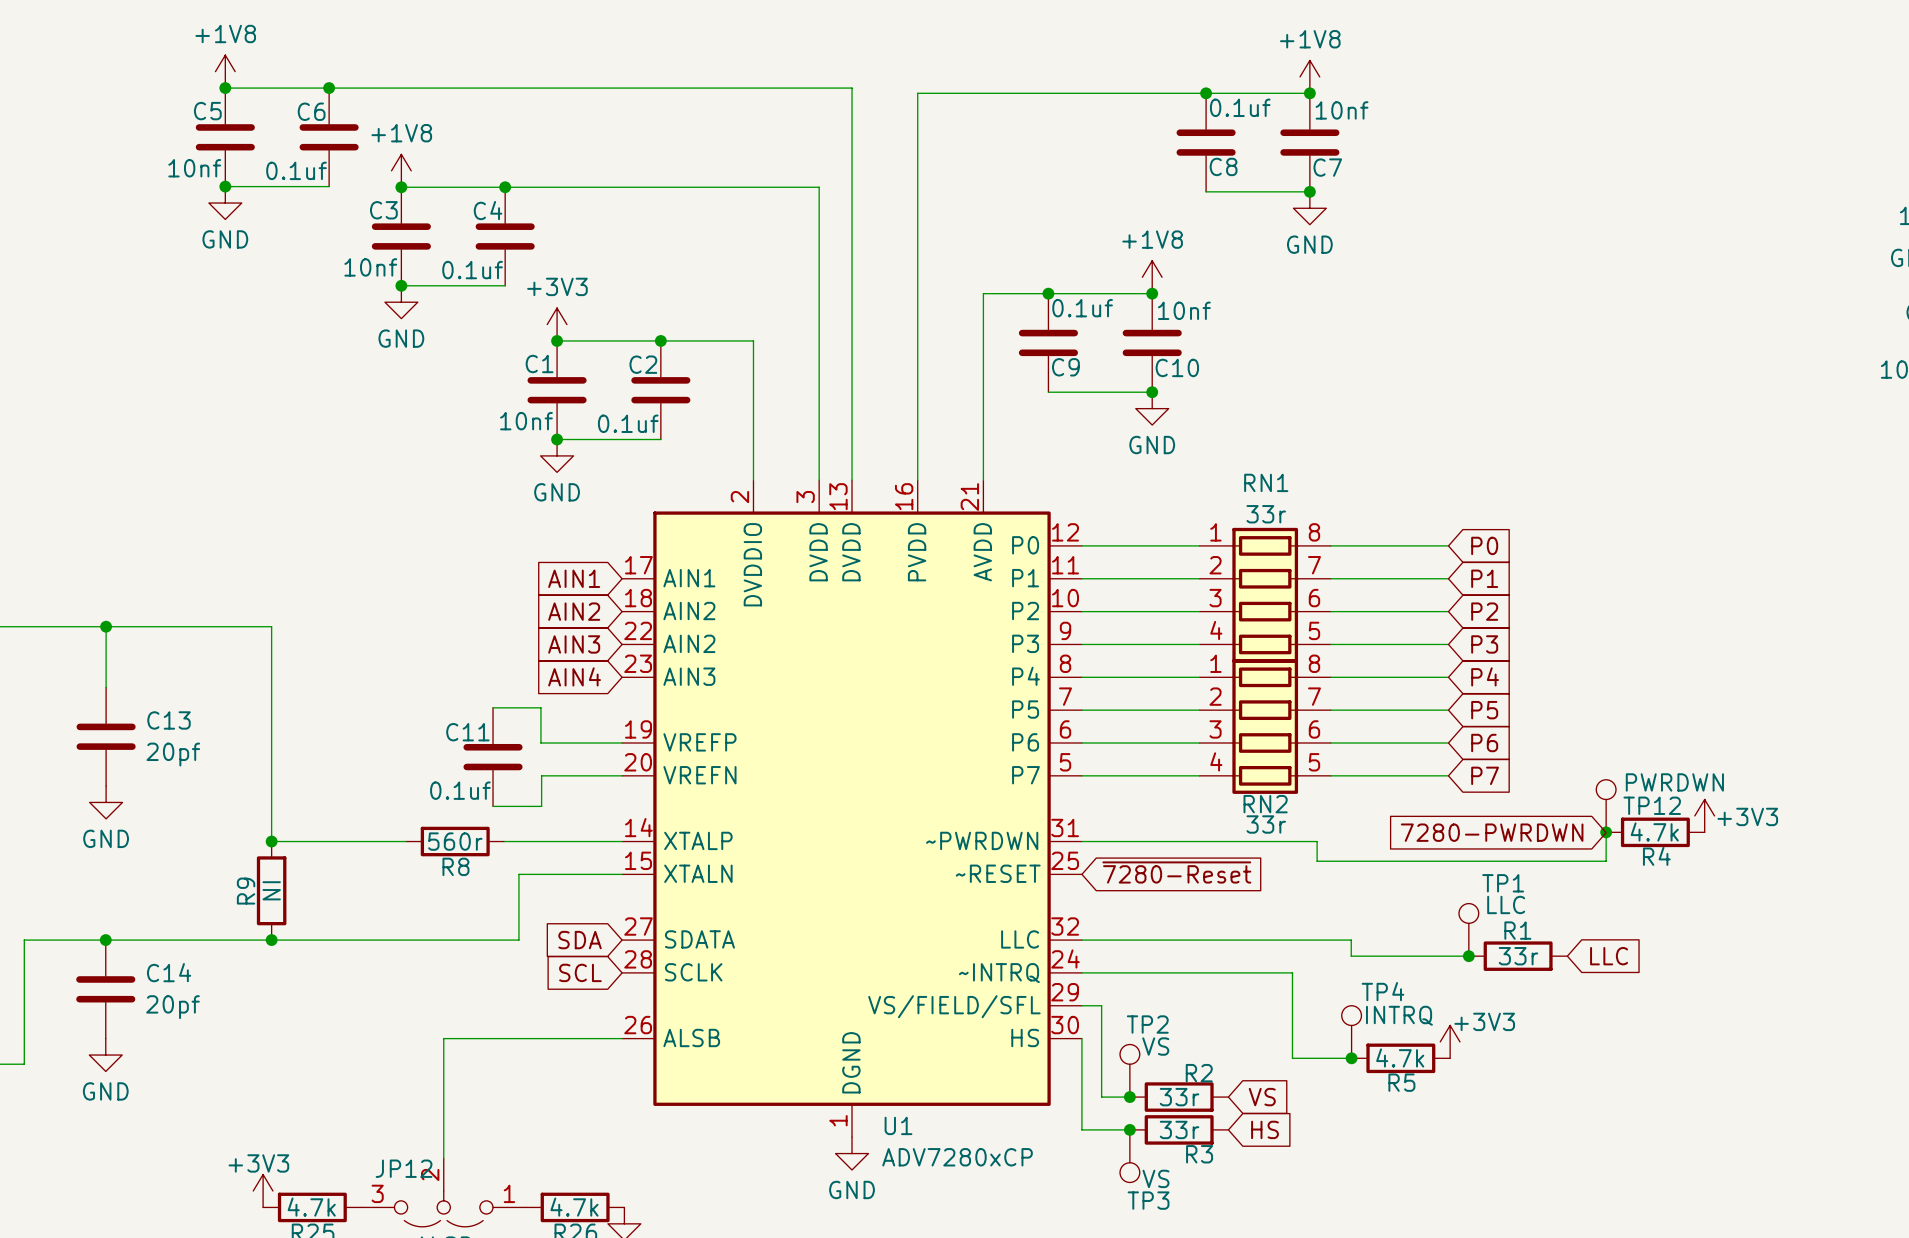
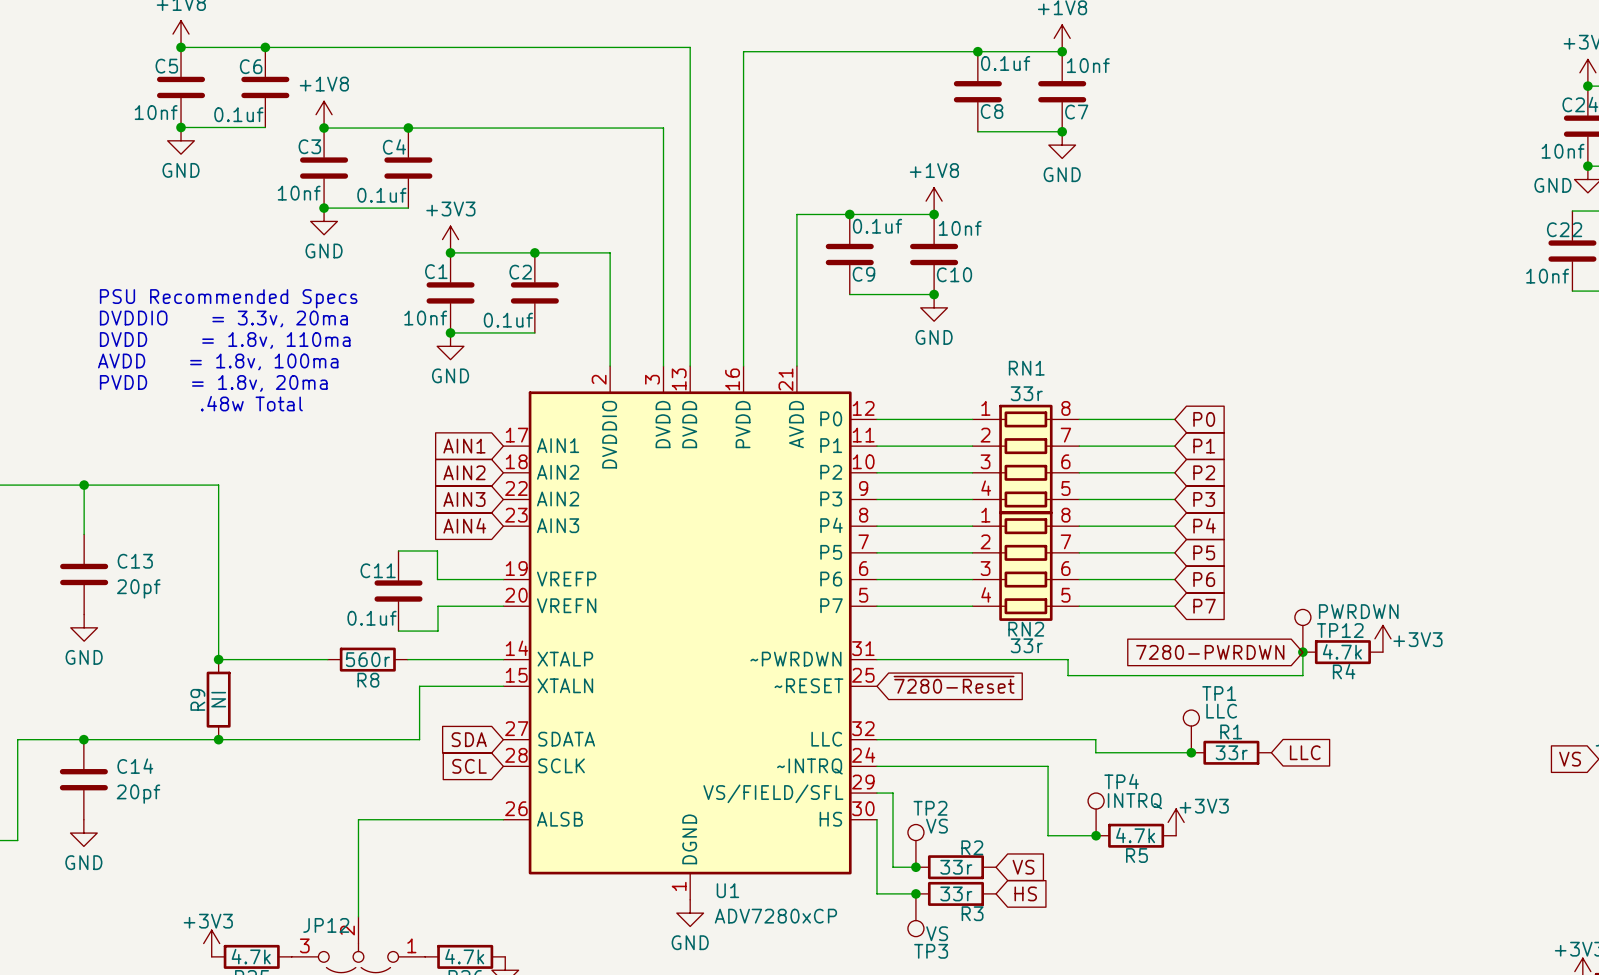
text: none -> PSU Recommended Specs (228, 298)
text: none -> DVDDIO = 3.3v, 20ma (223, 318)
text: none -> DVDD = 1.8v, 110ma (225, 340)
text: none -> AVDD = 1.8v, 100ma (218, 361)
text: none -> PVDD = 1.8v, 20ma (213, 383)
text: none -> .48w Total (251, 403)

